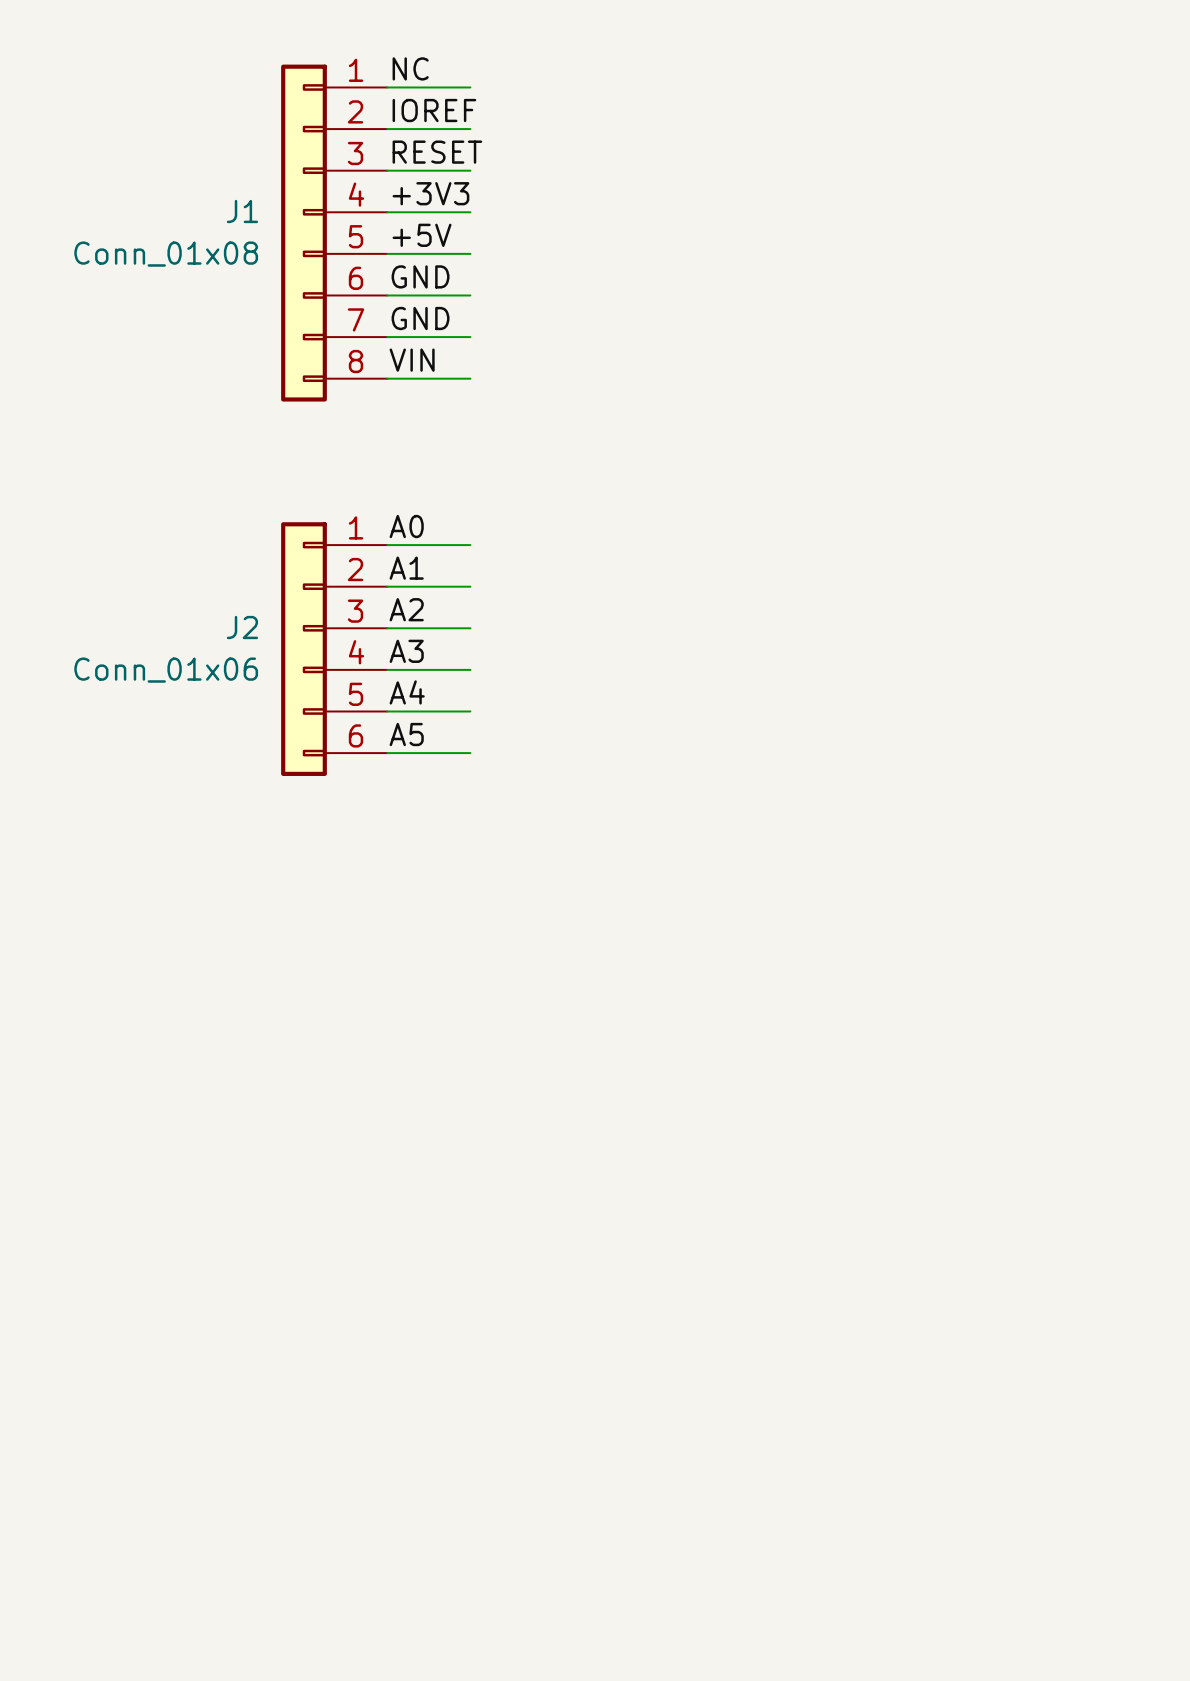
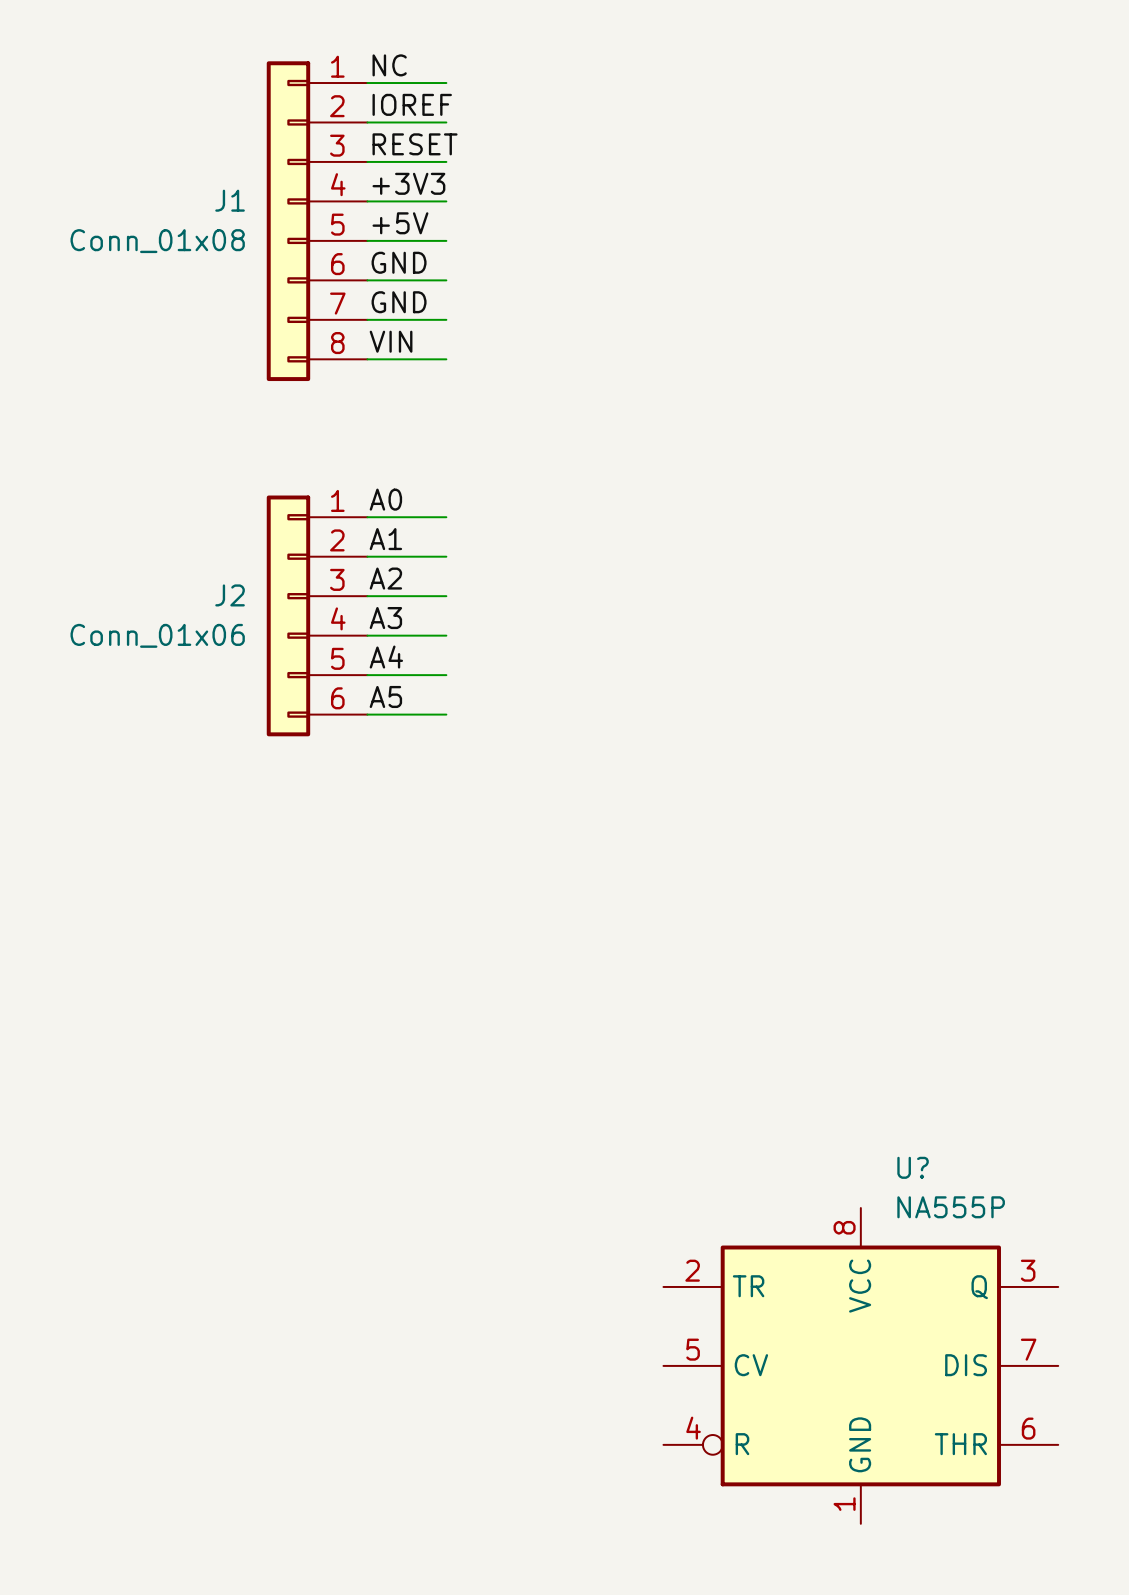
U?: none -> NA555P (860, 1365)

